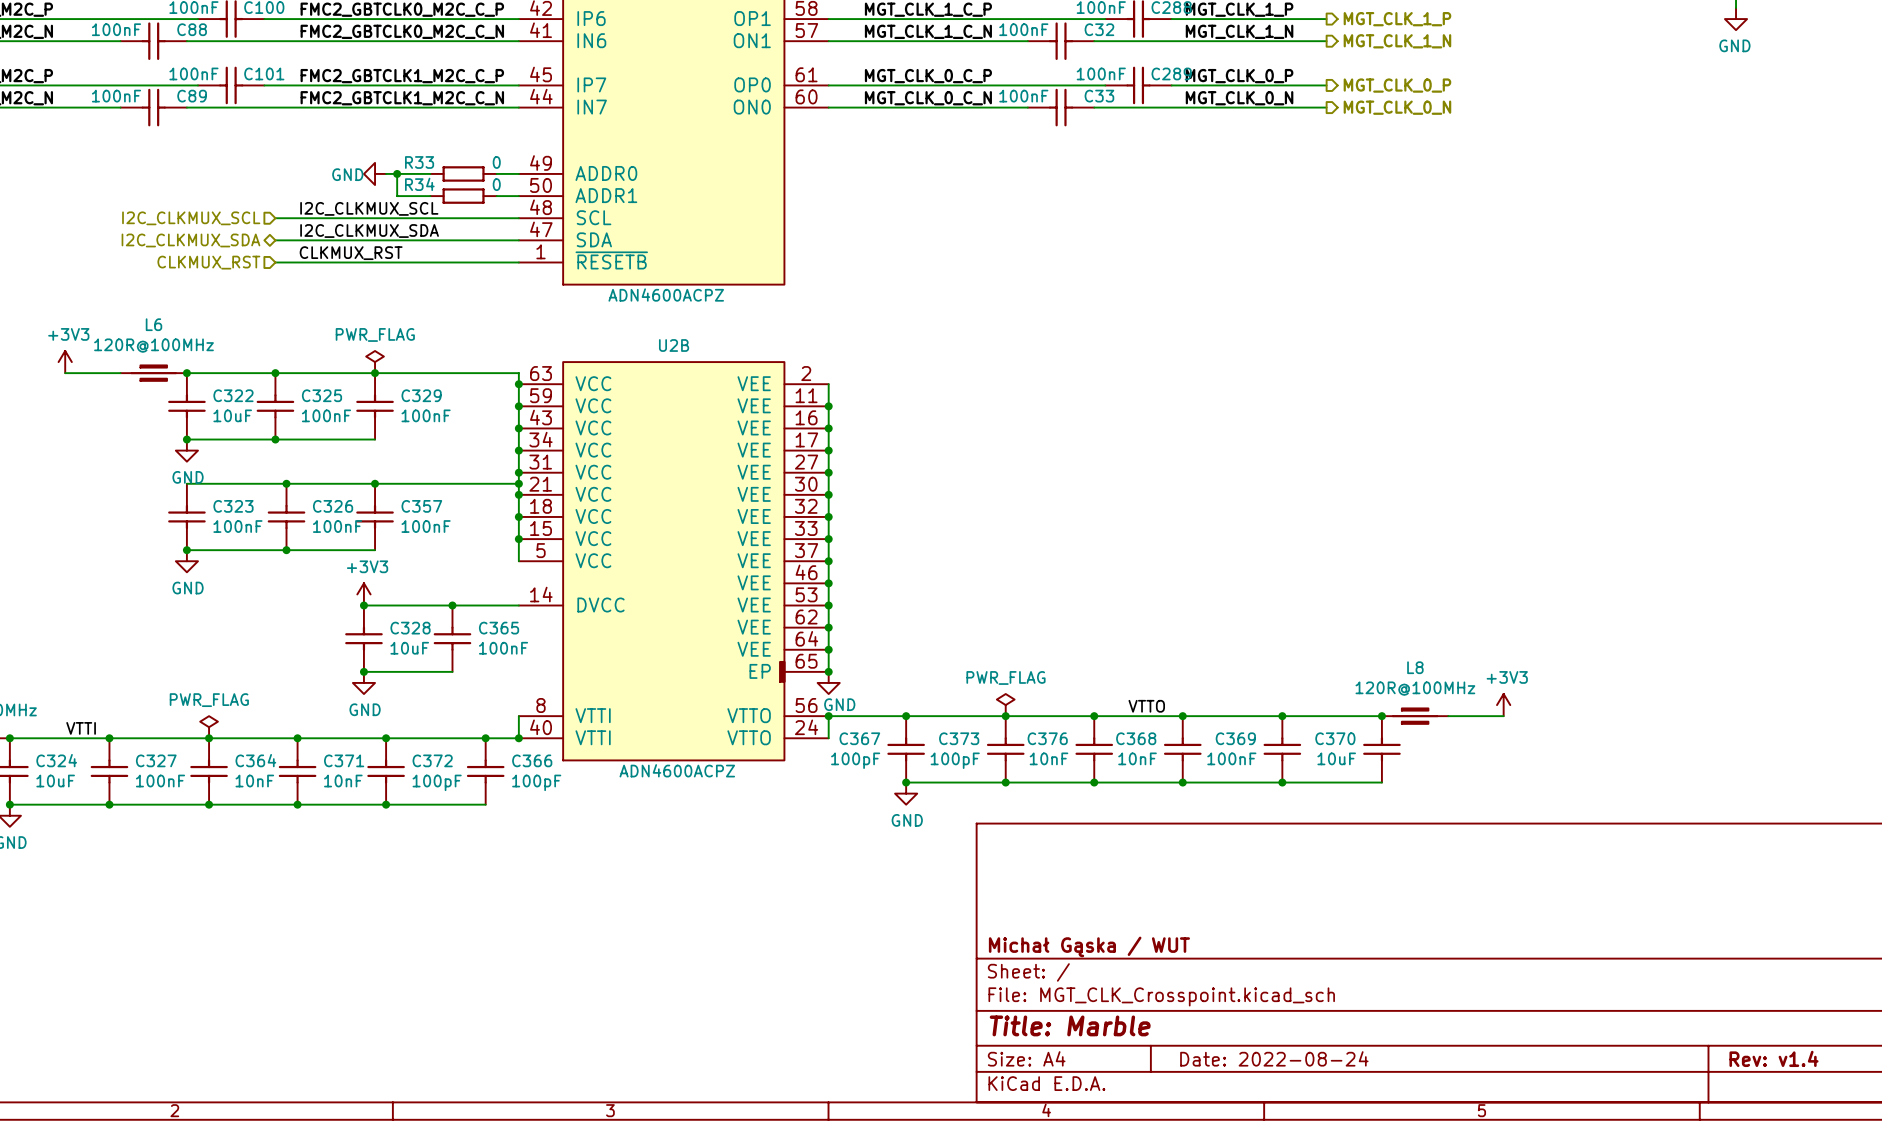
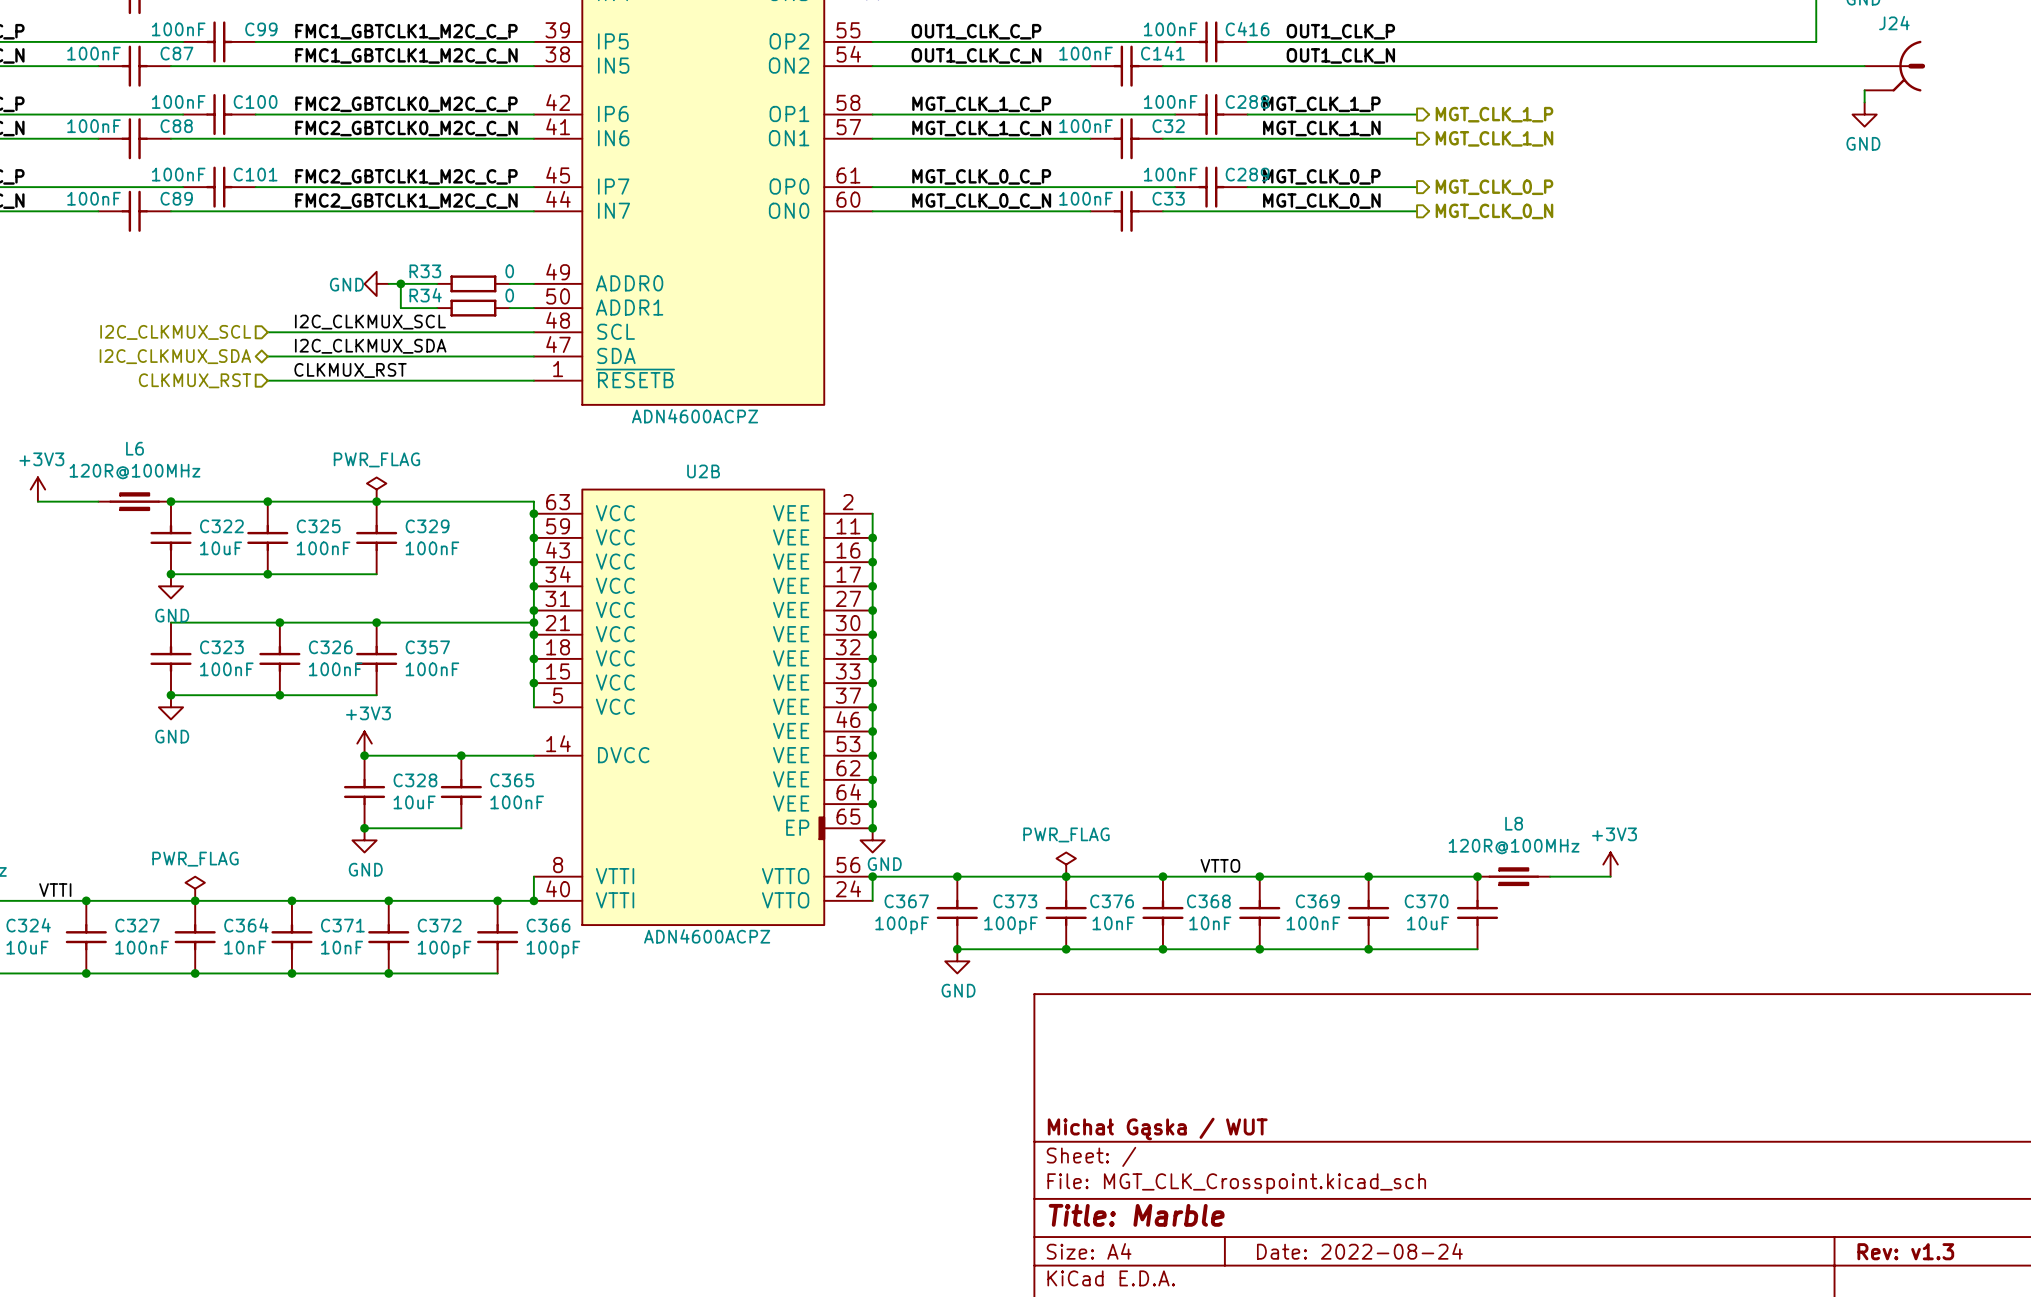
title block: Rev: v1.4 (1773, 1058) -> Rev: v1.3 (1905, 1251)

